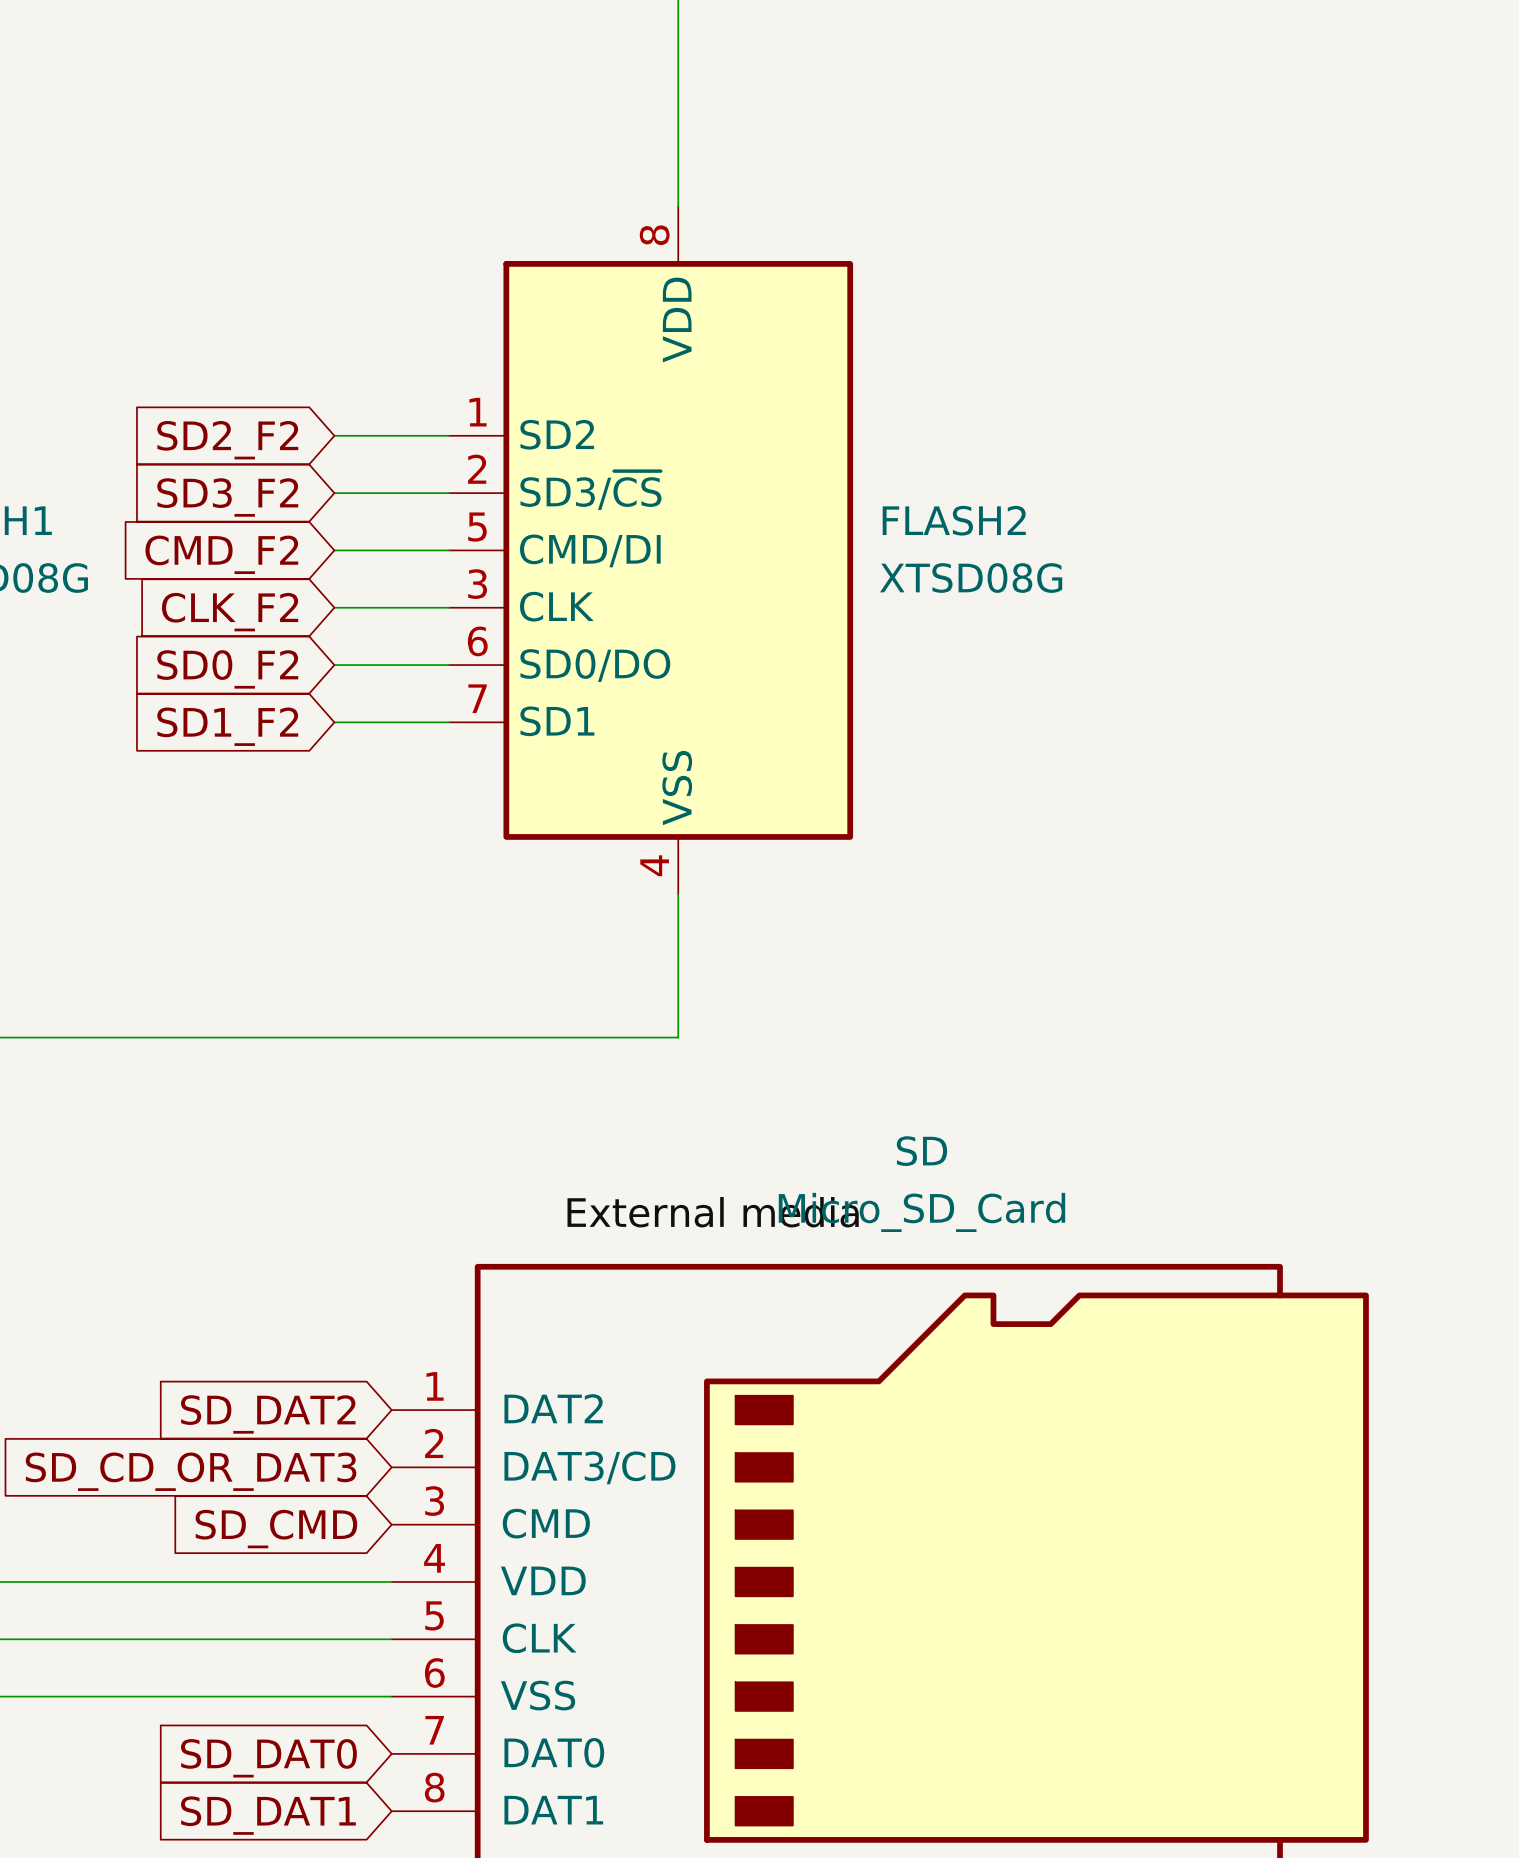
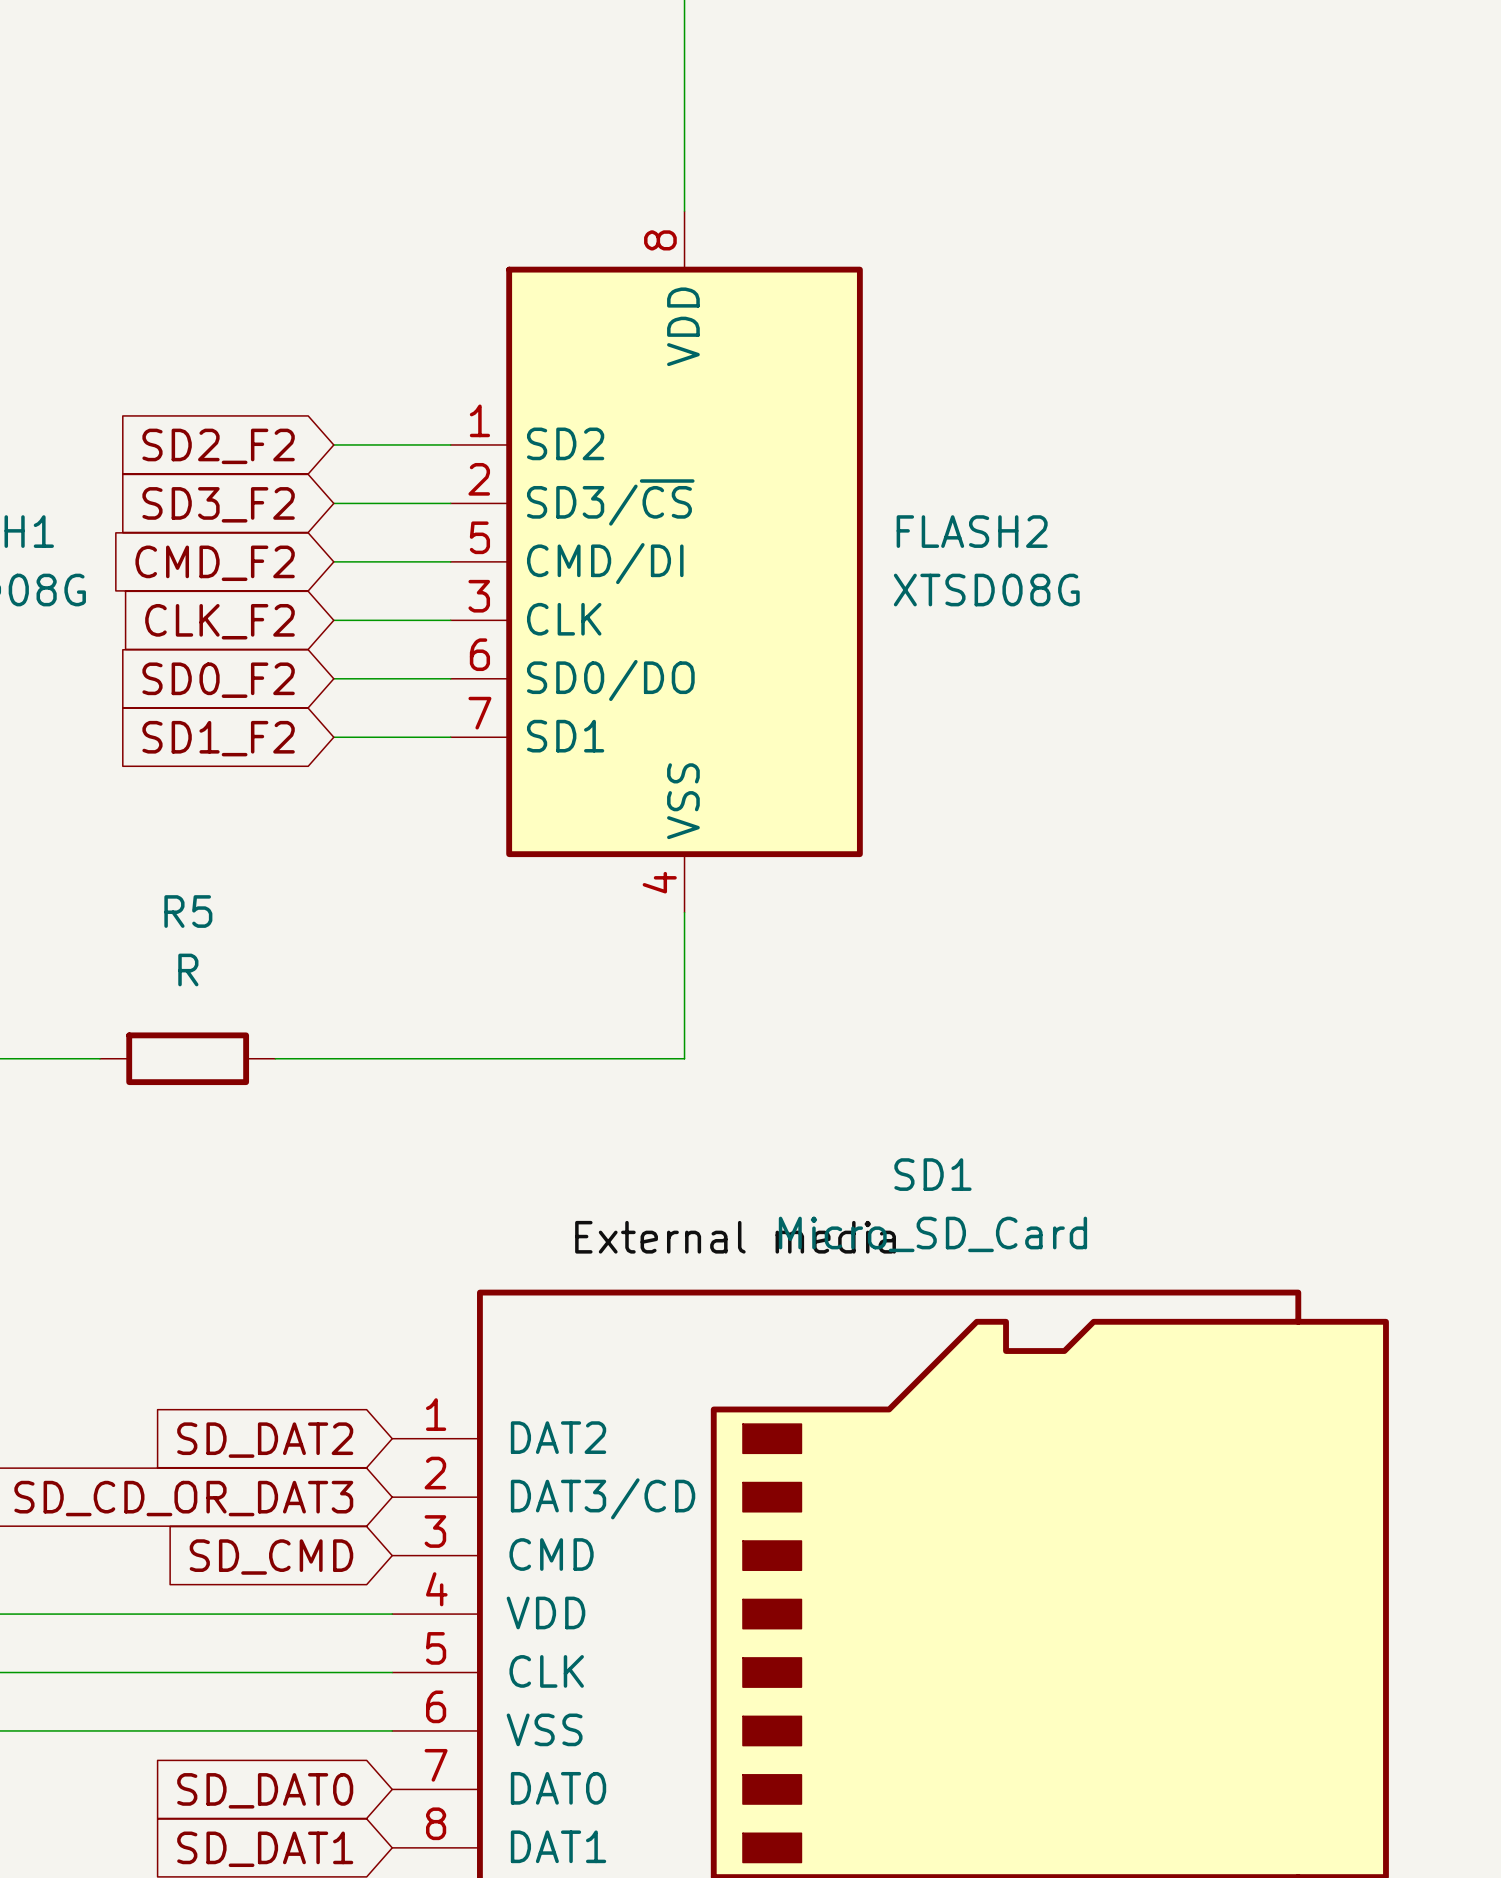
wire: (105, 1037) (277, 1037) -> none
R5: none -> R (187, 1058)
SD name: SD (921, 1151) -> SD1 (932, 1174)

